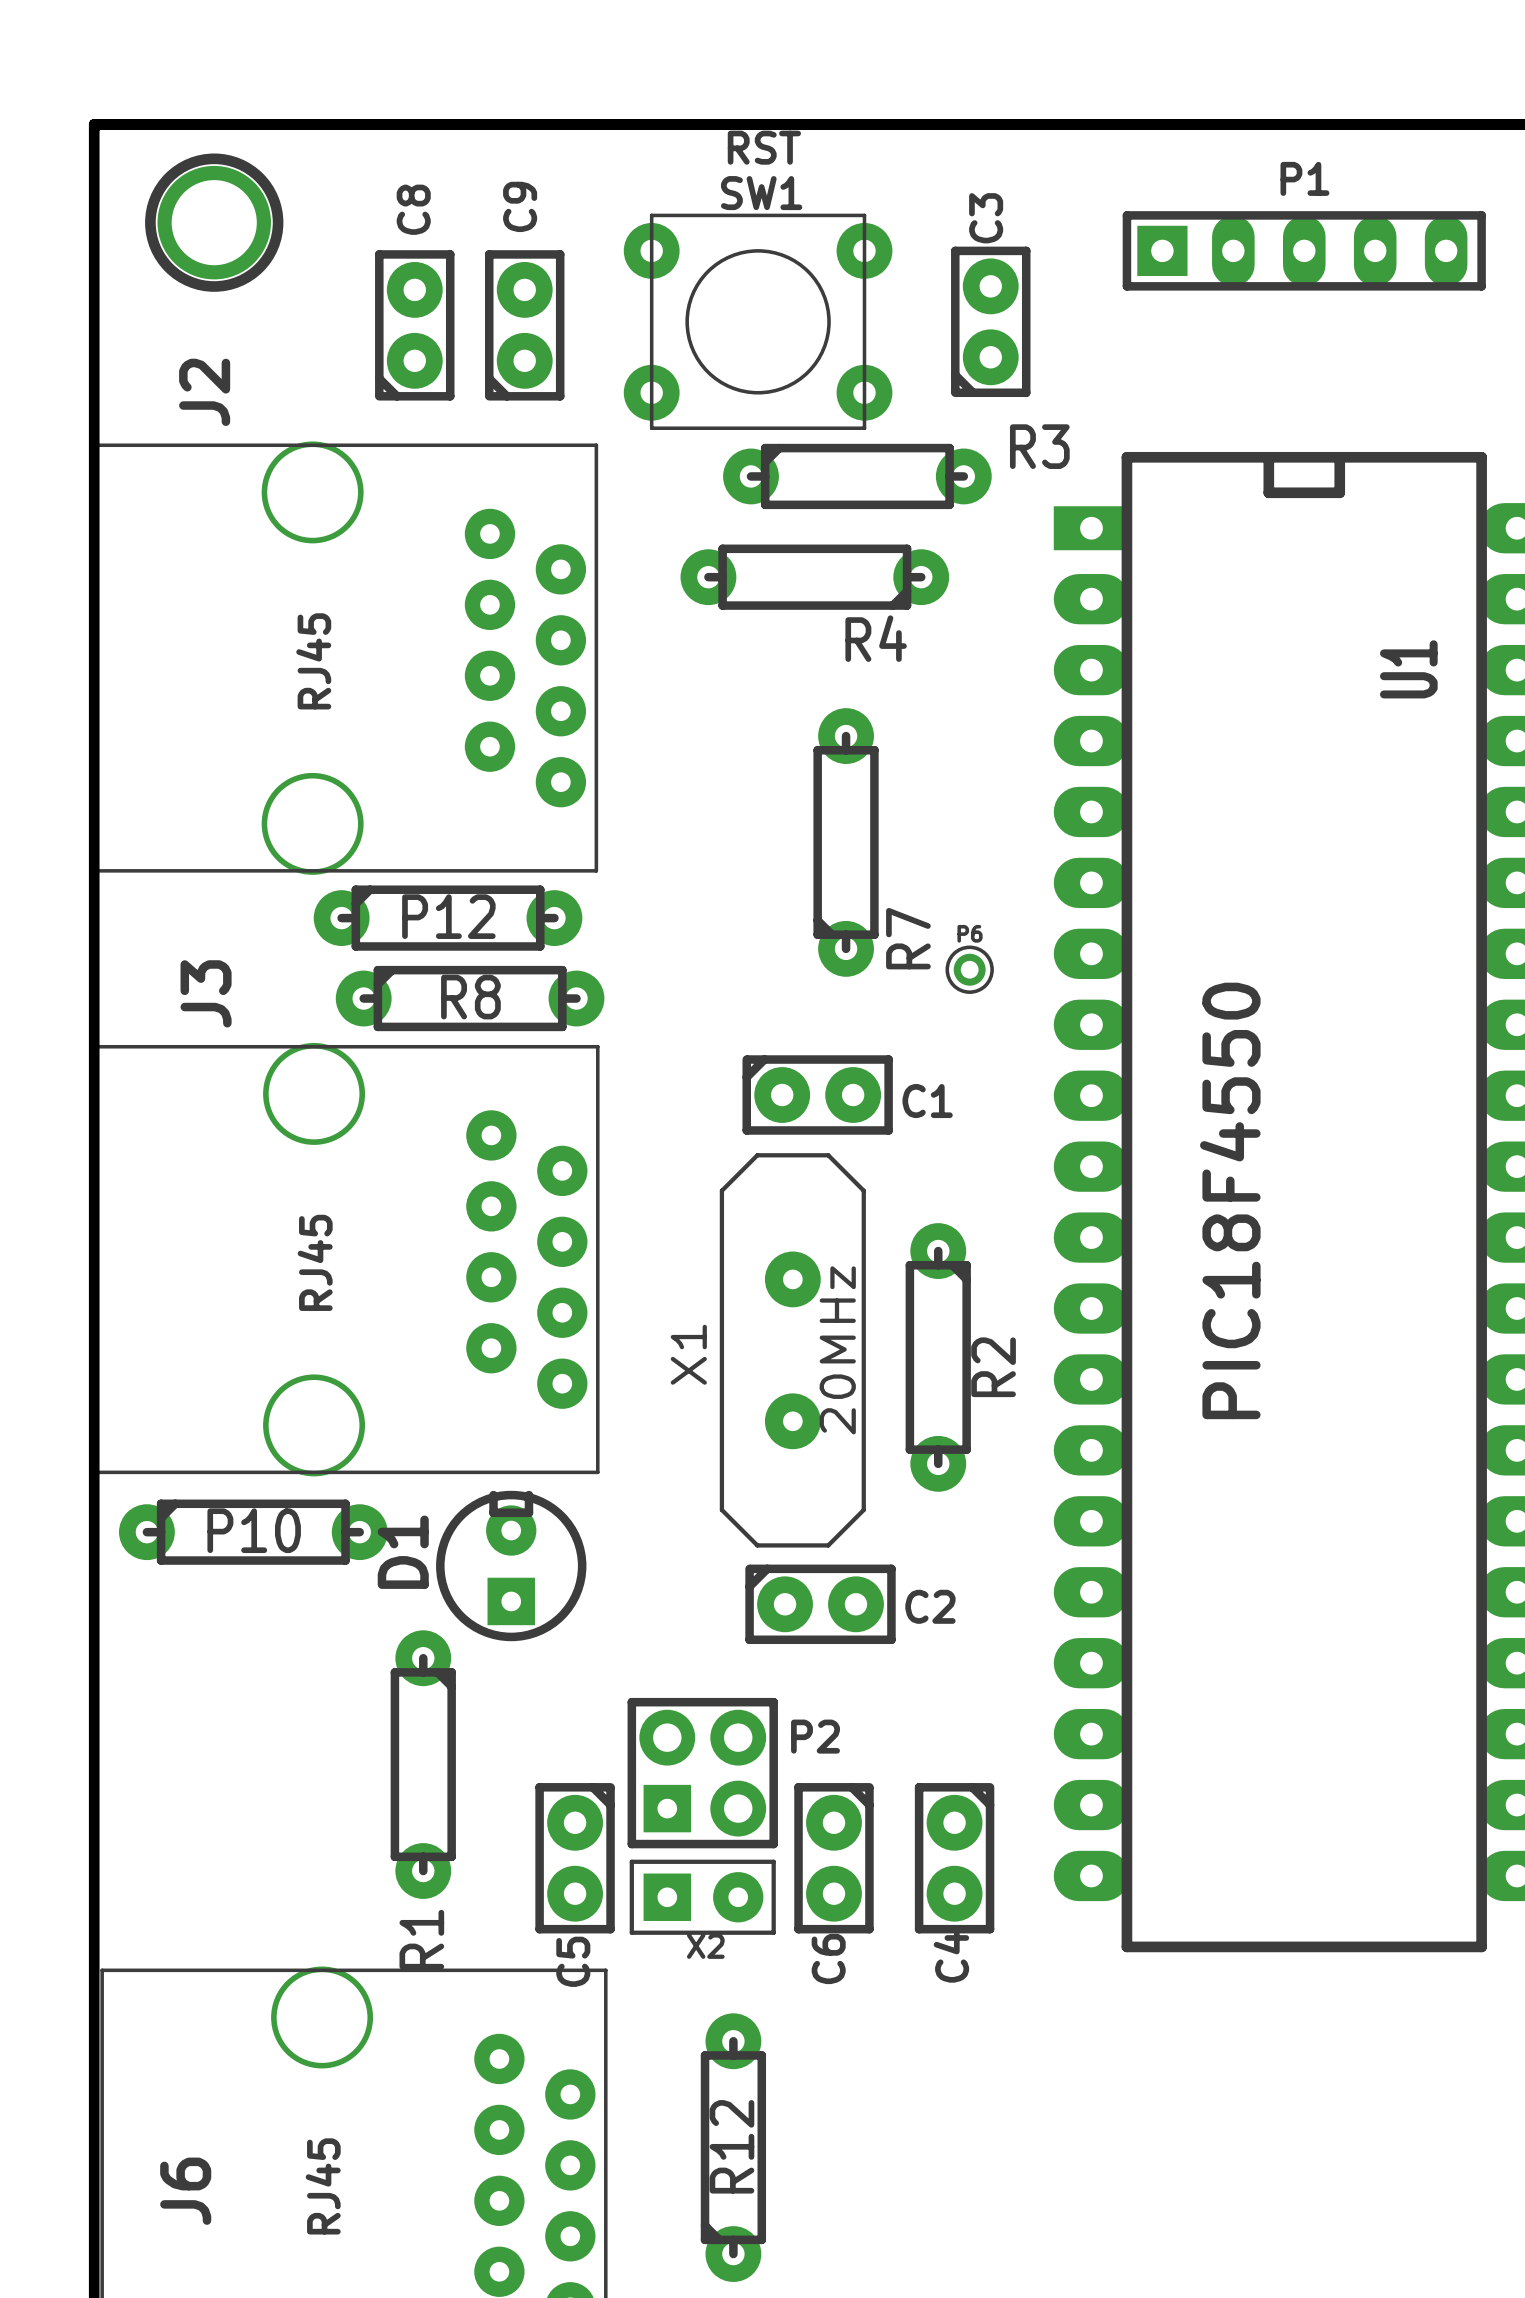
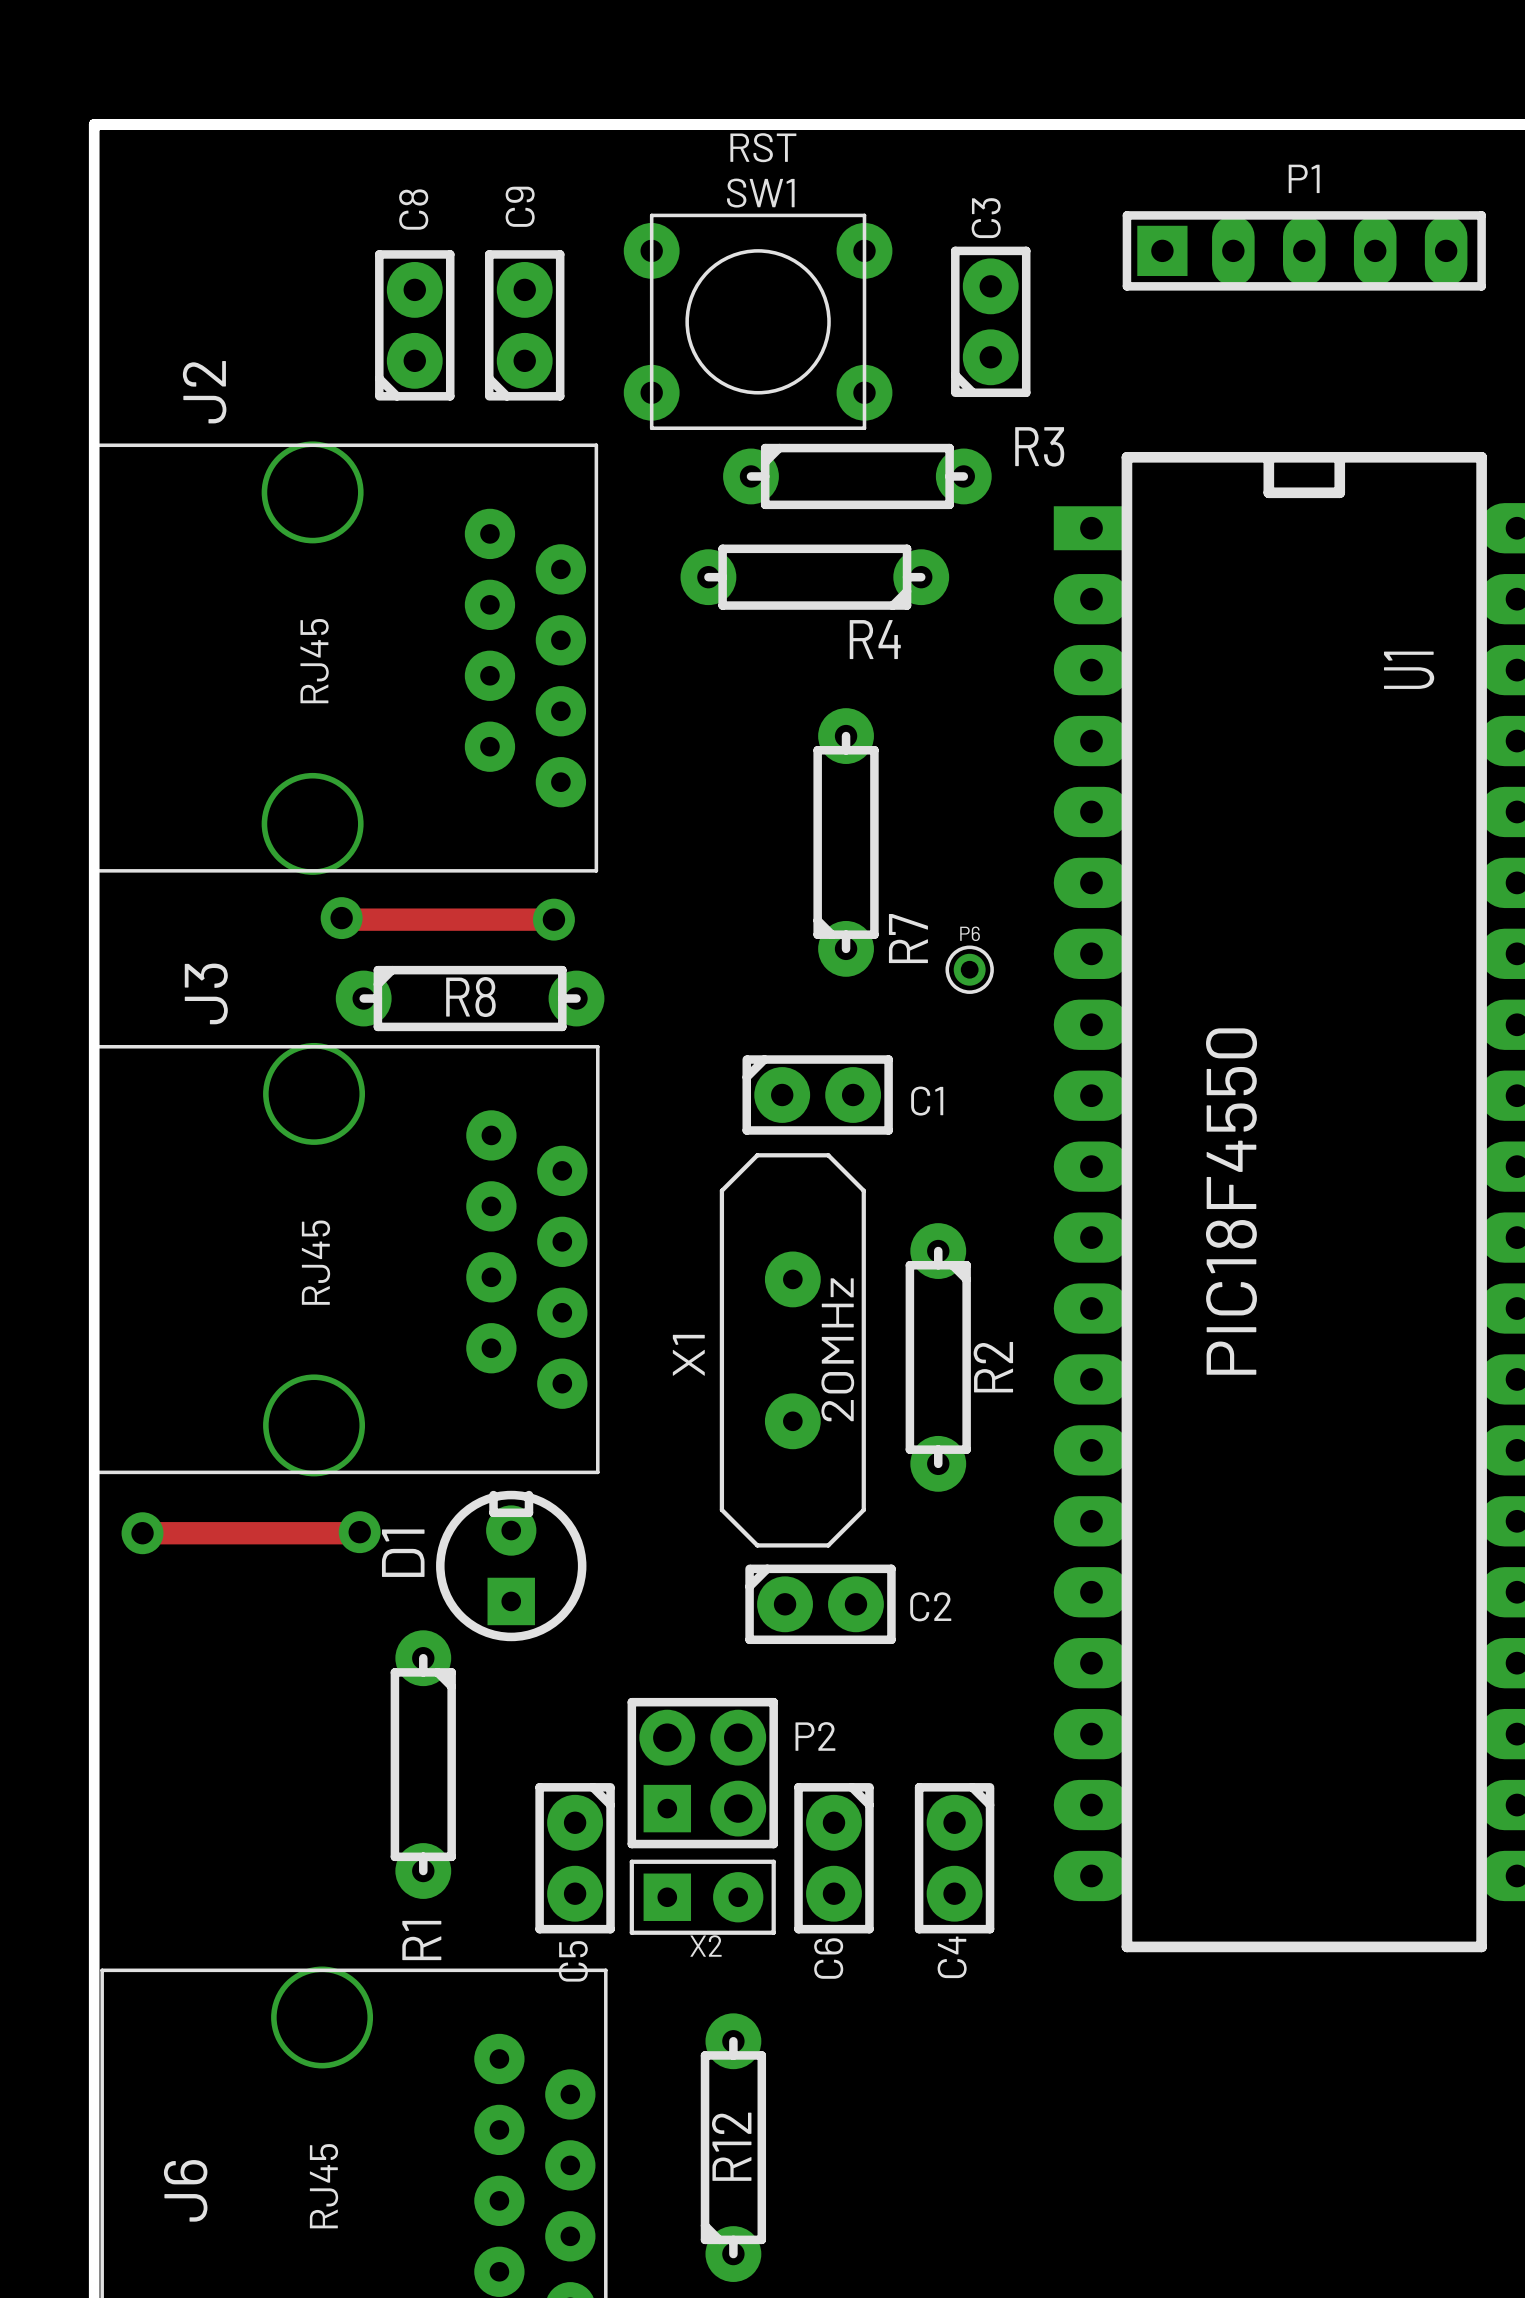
part: (214, 222) -> none
track: none -> (341, 918) (343, 919) (553, 919)
via: none -> (341, 918)
P12: (448, 918) -> none
via: none -> (553, 919)
P10: (253, 1532) -> none
track: none -> (359, 1532) (142, 1533)
via: none -> (359, 1532)
via: none -> (142, 1533)

